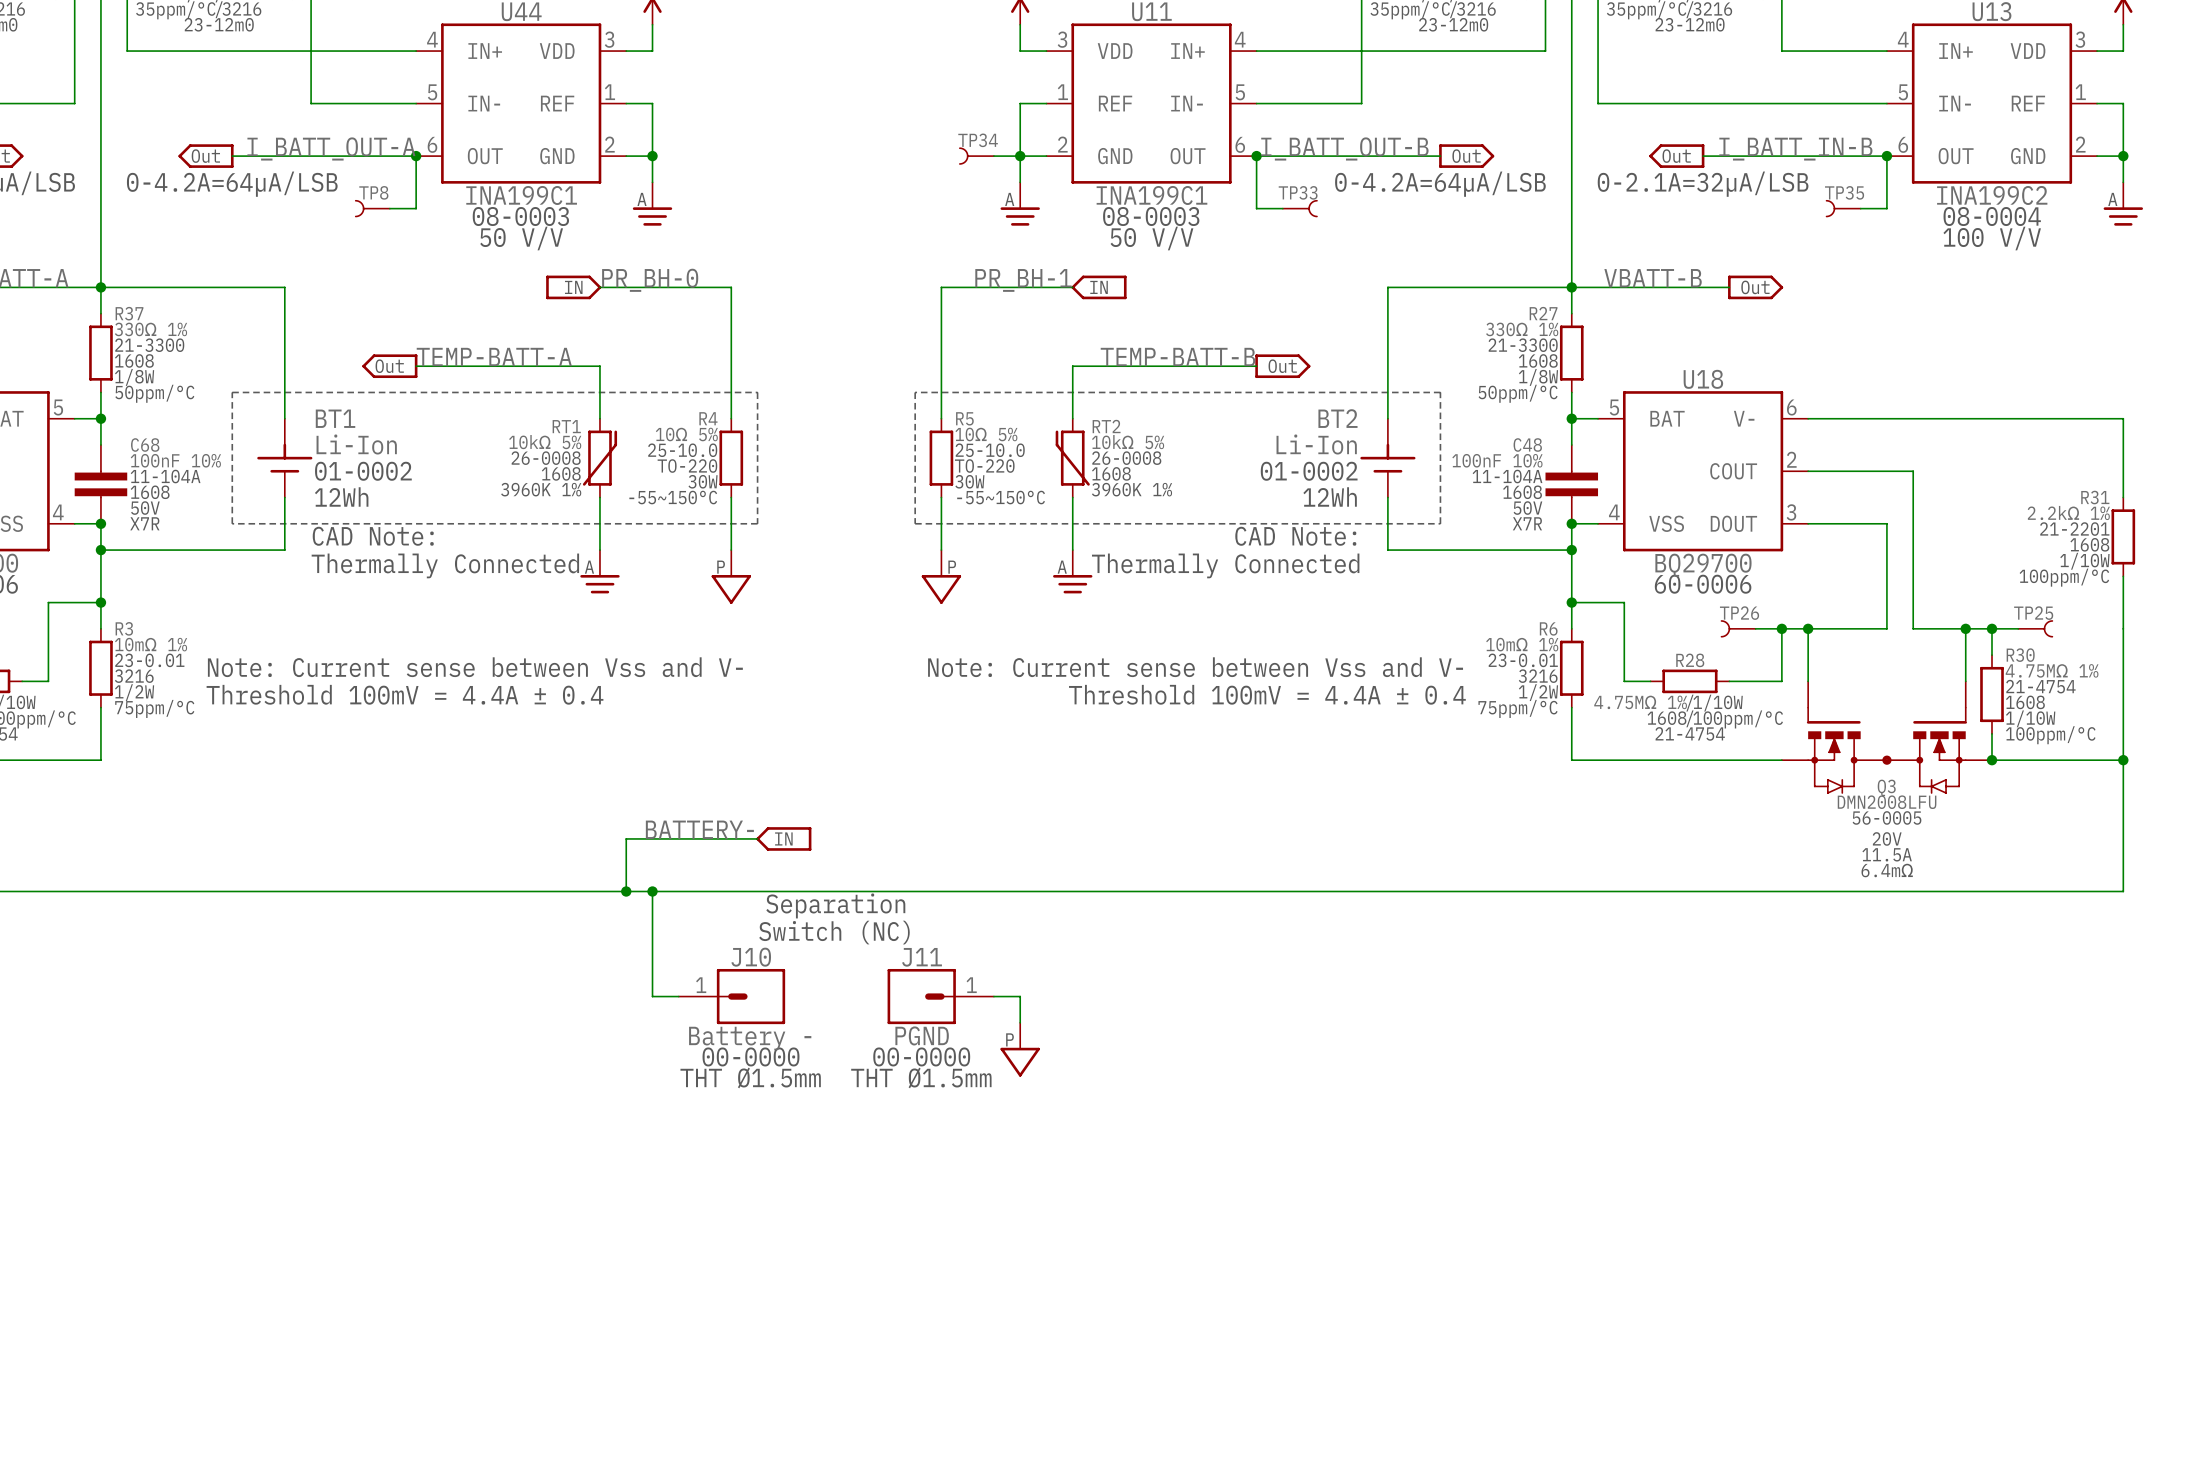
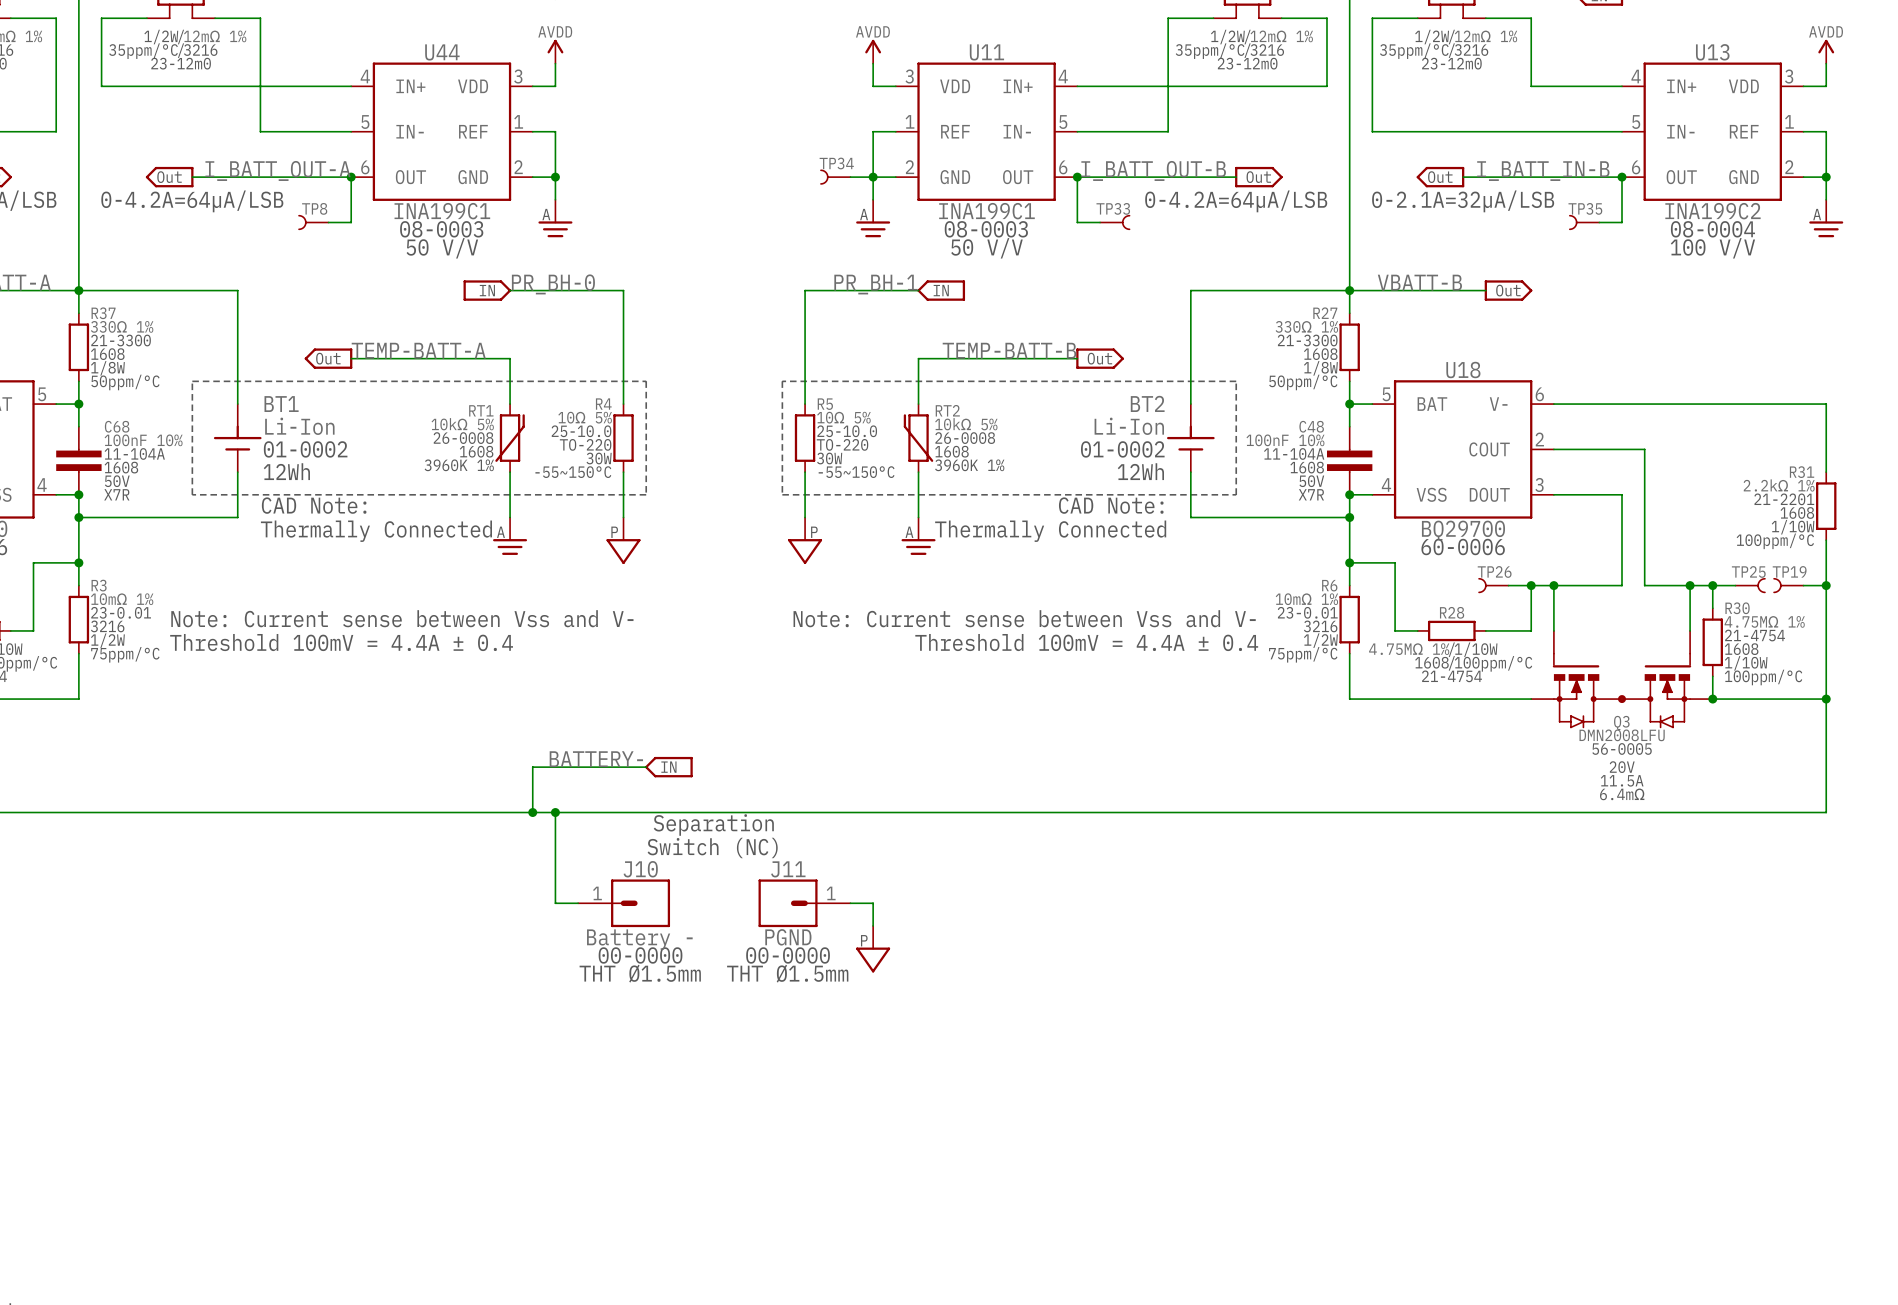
TP19: none -> (1788, 585)
wire: none -> (1803, 585) (1826, 585)
junction: none -> (1826, 585)

